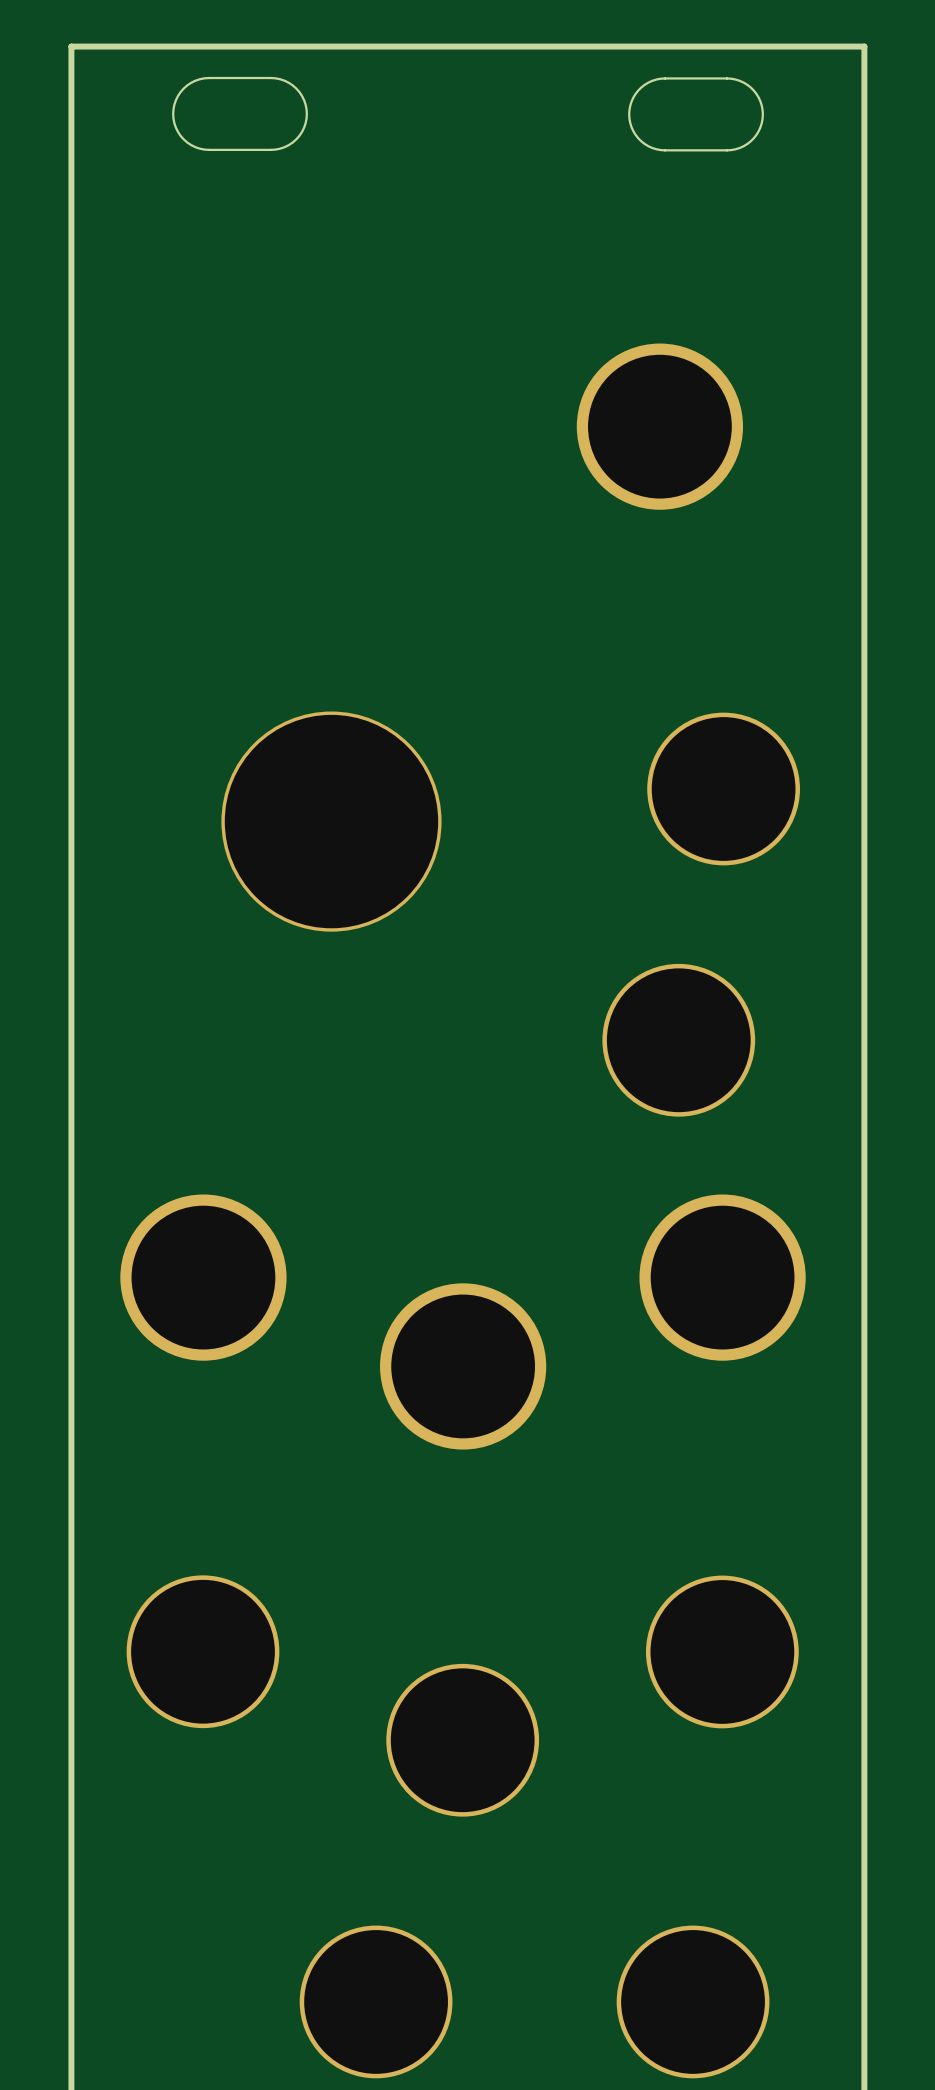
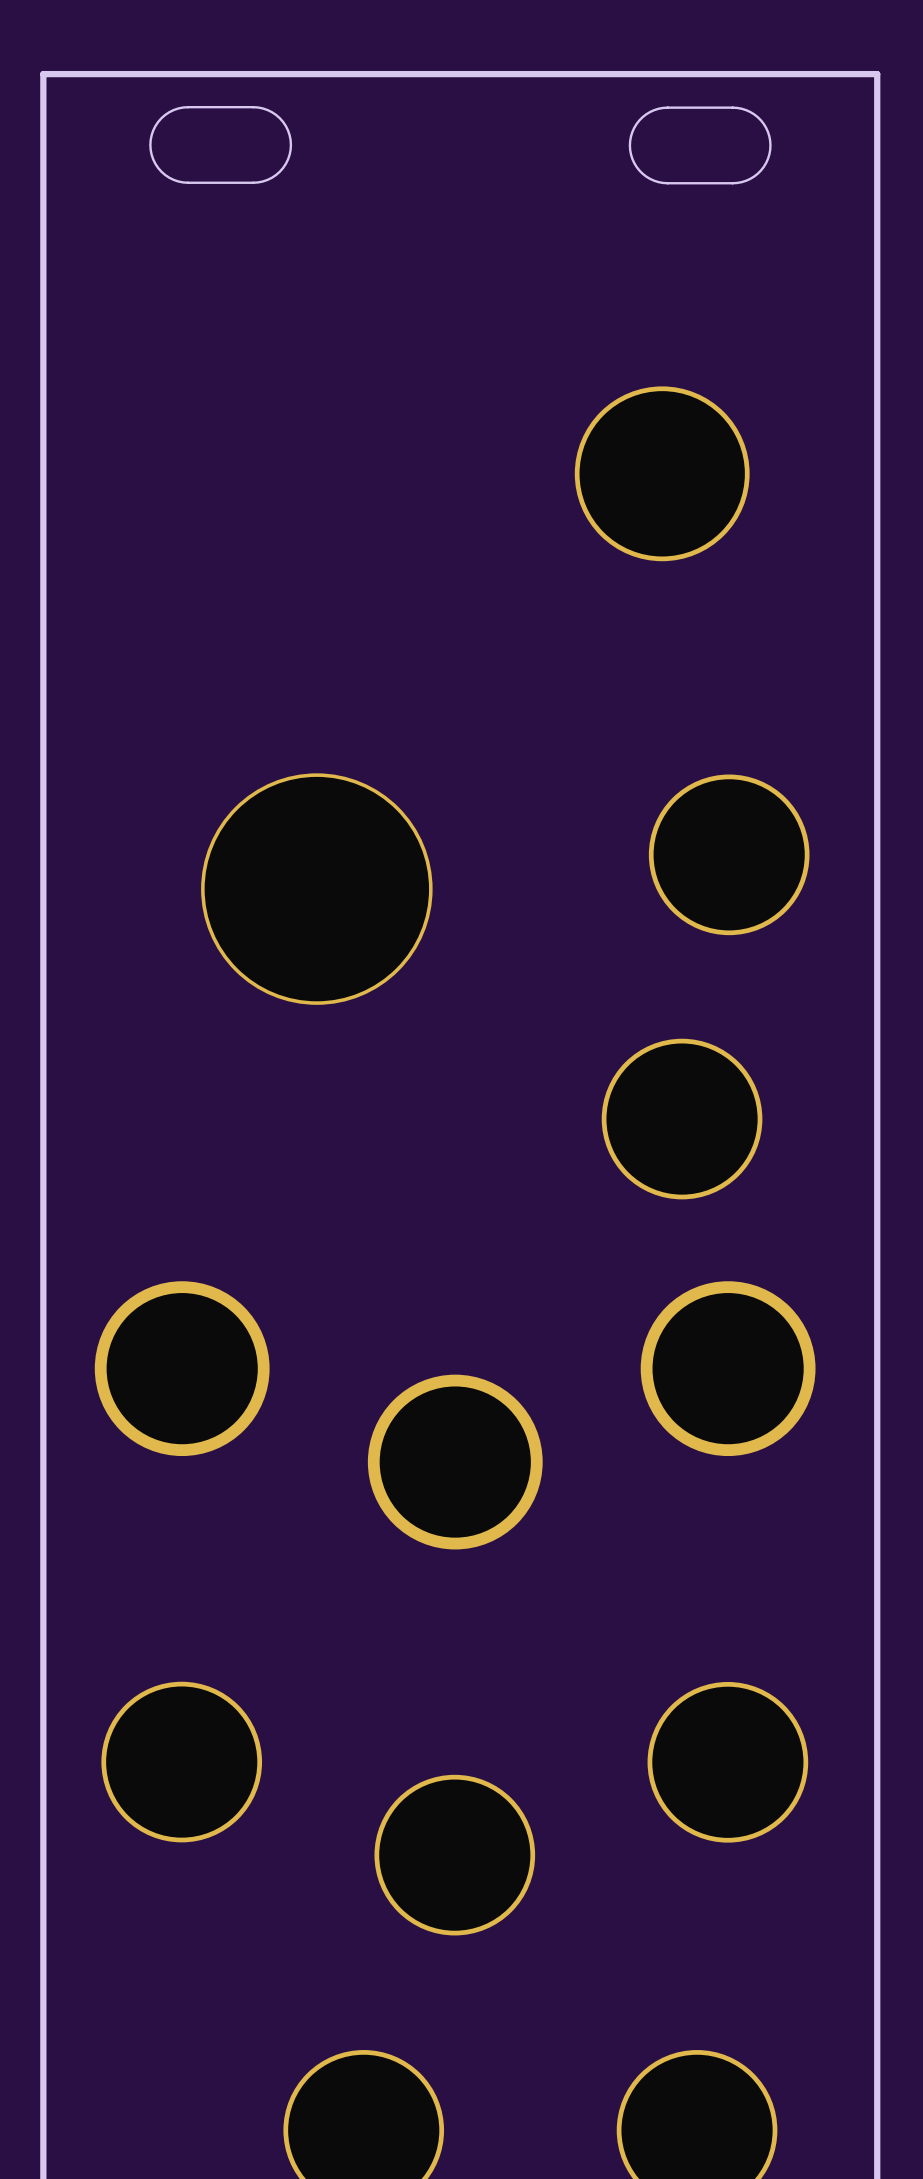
part footprint: [576, 343, 744, 510] -> [574, 386, 750, 562]

